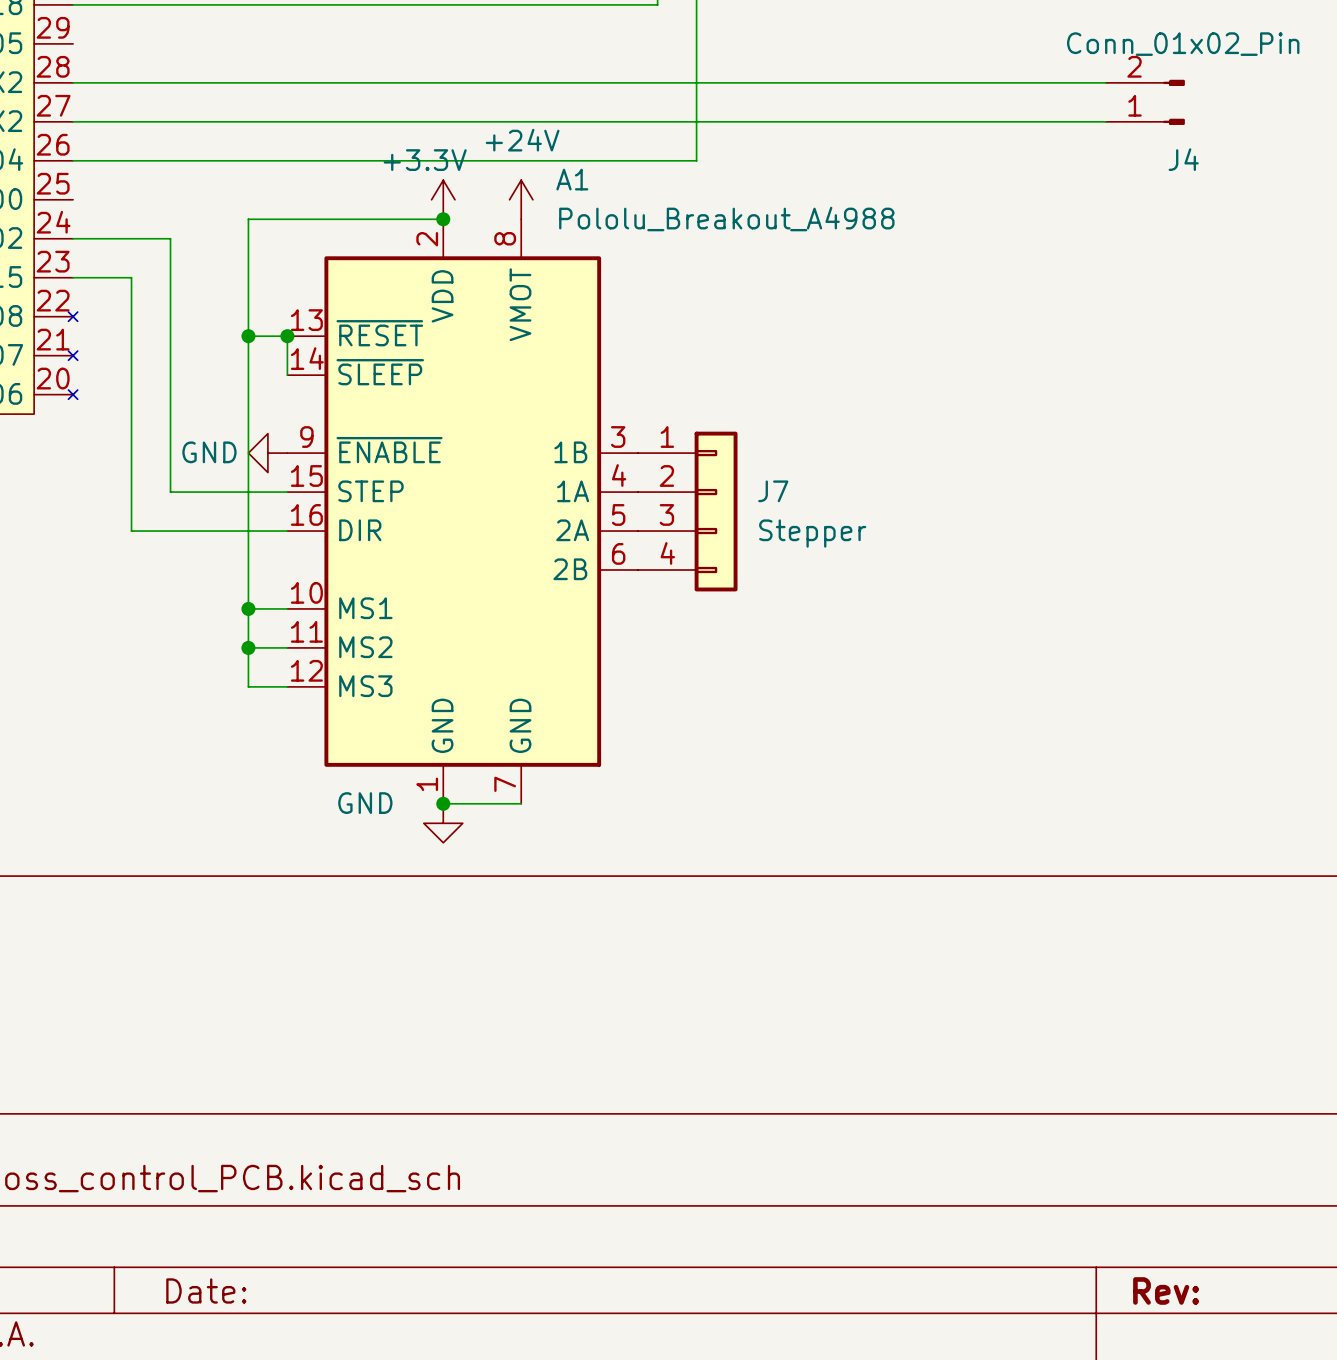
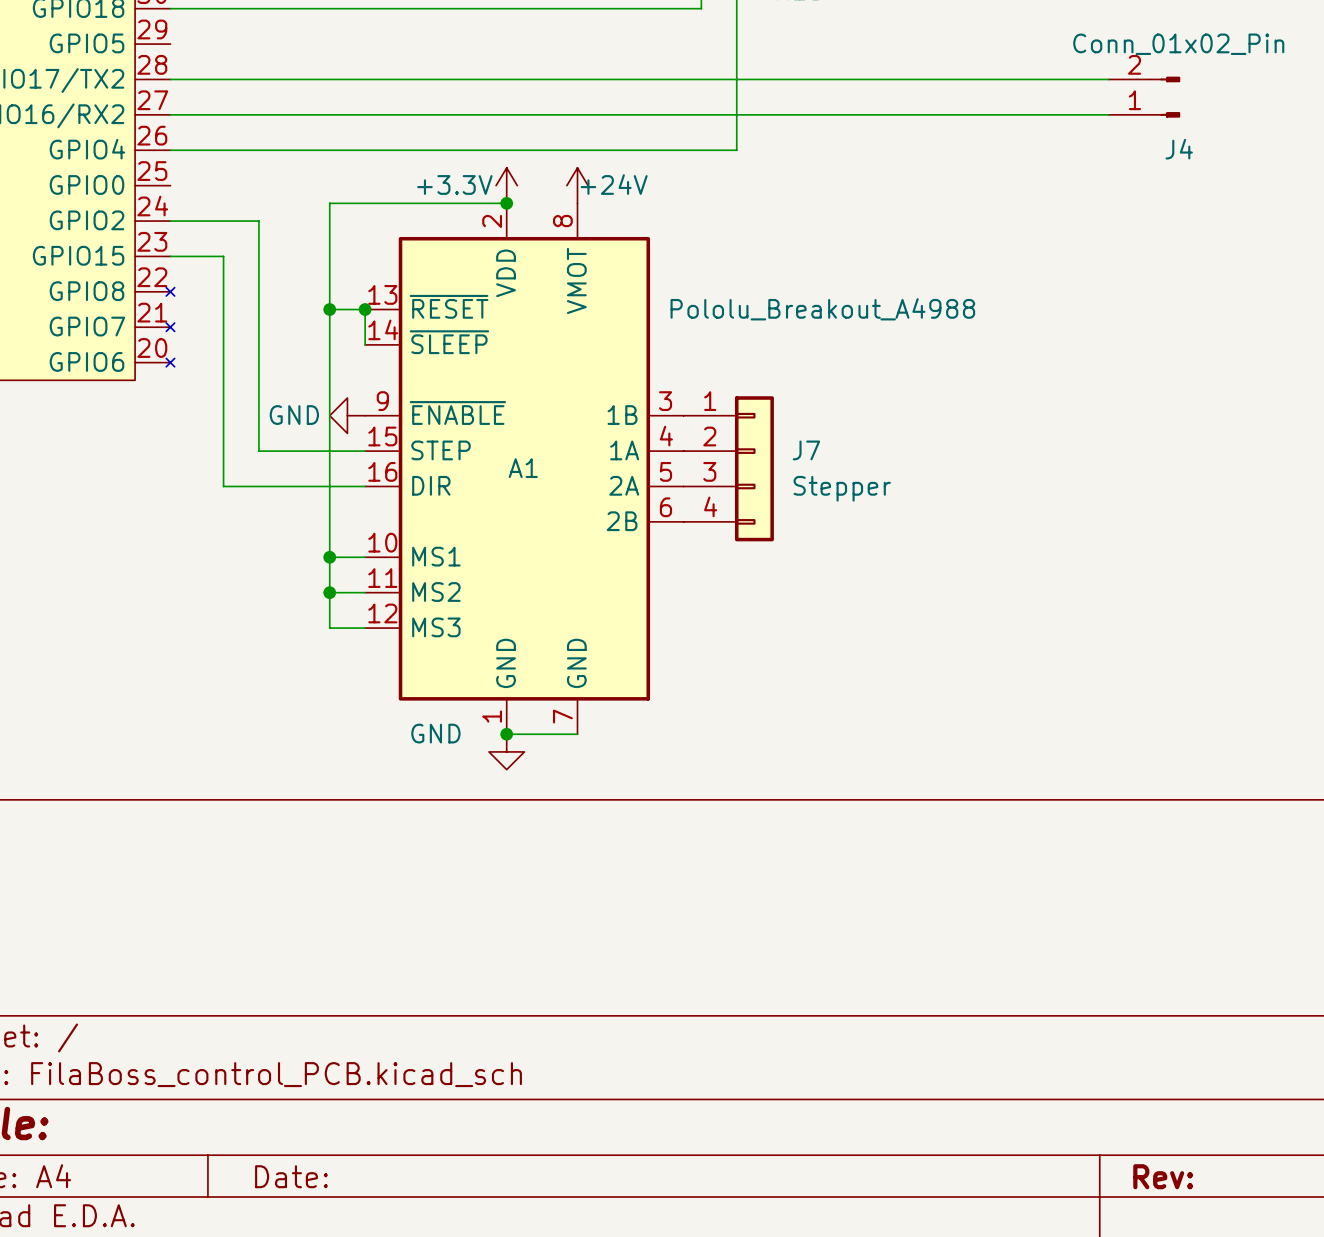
power symbol text position: +24V (522, 140) -> +24V (614, 184)
power symbol text position: +3.3V (425, 160) -> +3.3V (454, 184)
A1 name position: A1 (572, 179) -> A1 (523, 468)
A1 value position: Pololu_Breakout_A4988 (726, 219) -> Pololu_Breakout_A4988 (822, 309)

